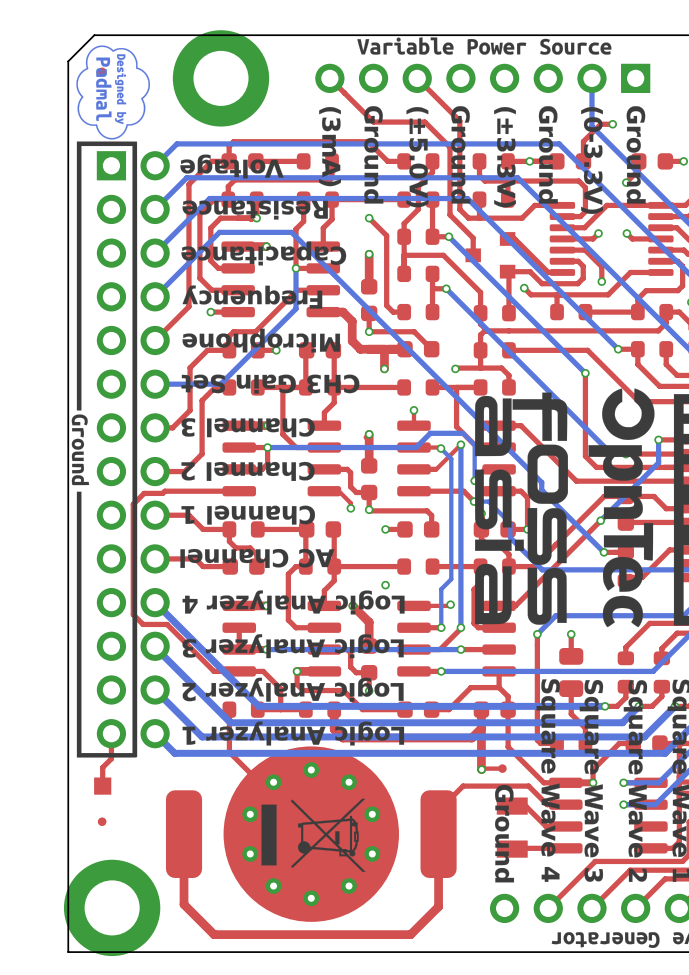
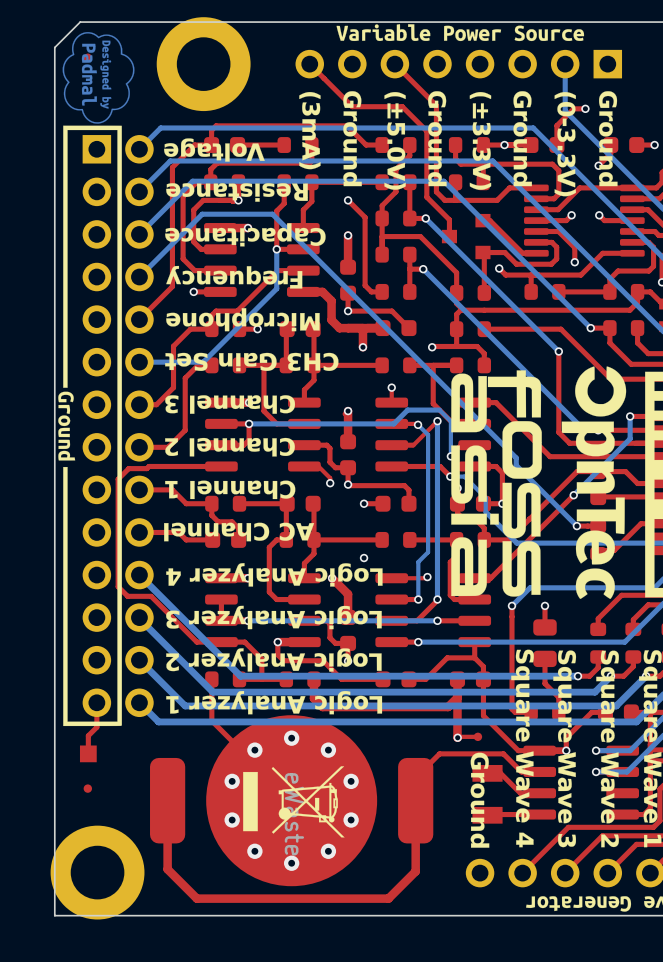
drawing shape: [261, 798, 366, 872] -> [243, 766, 345, 856]

